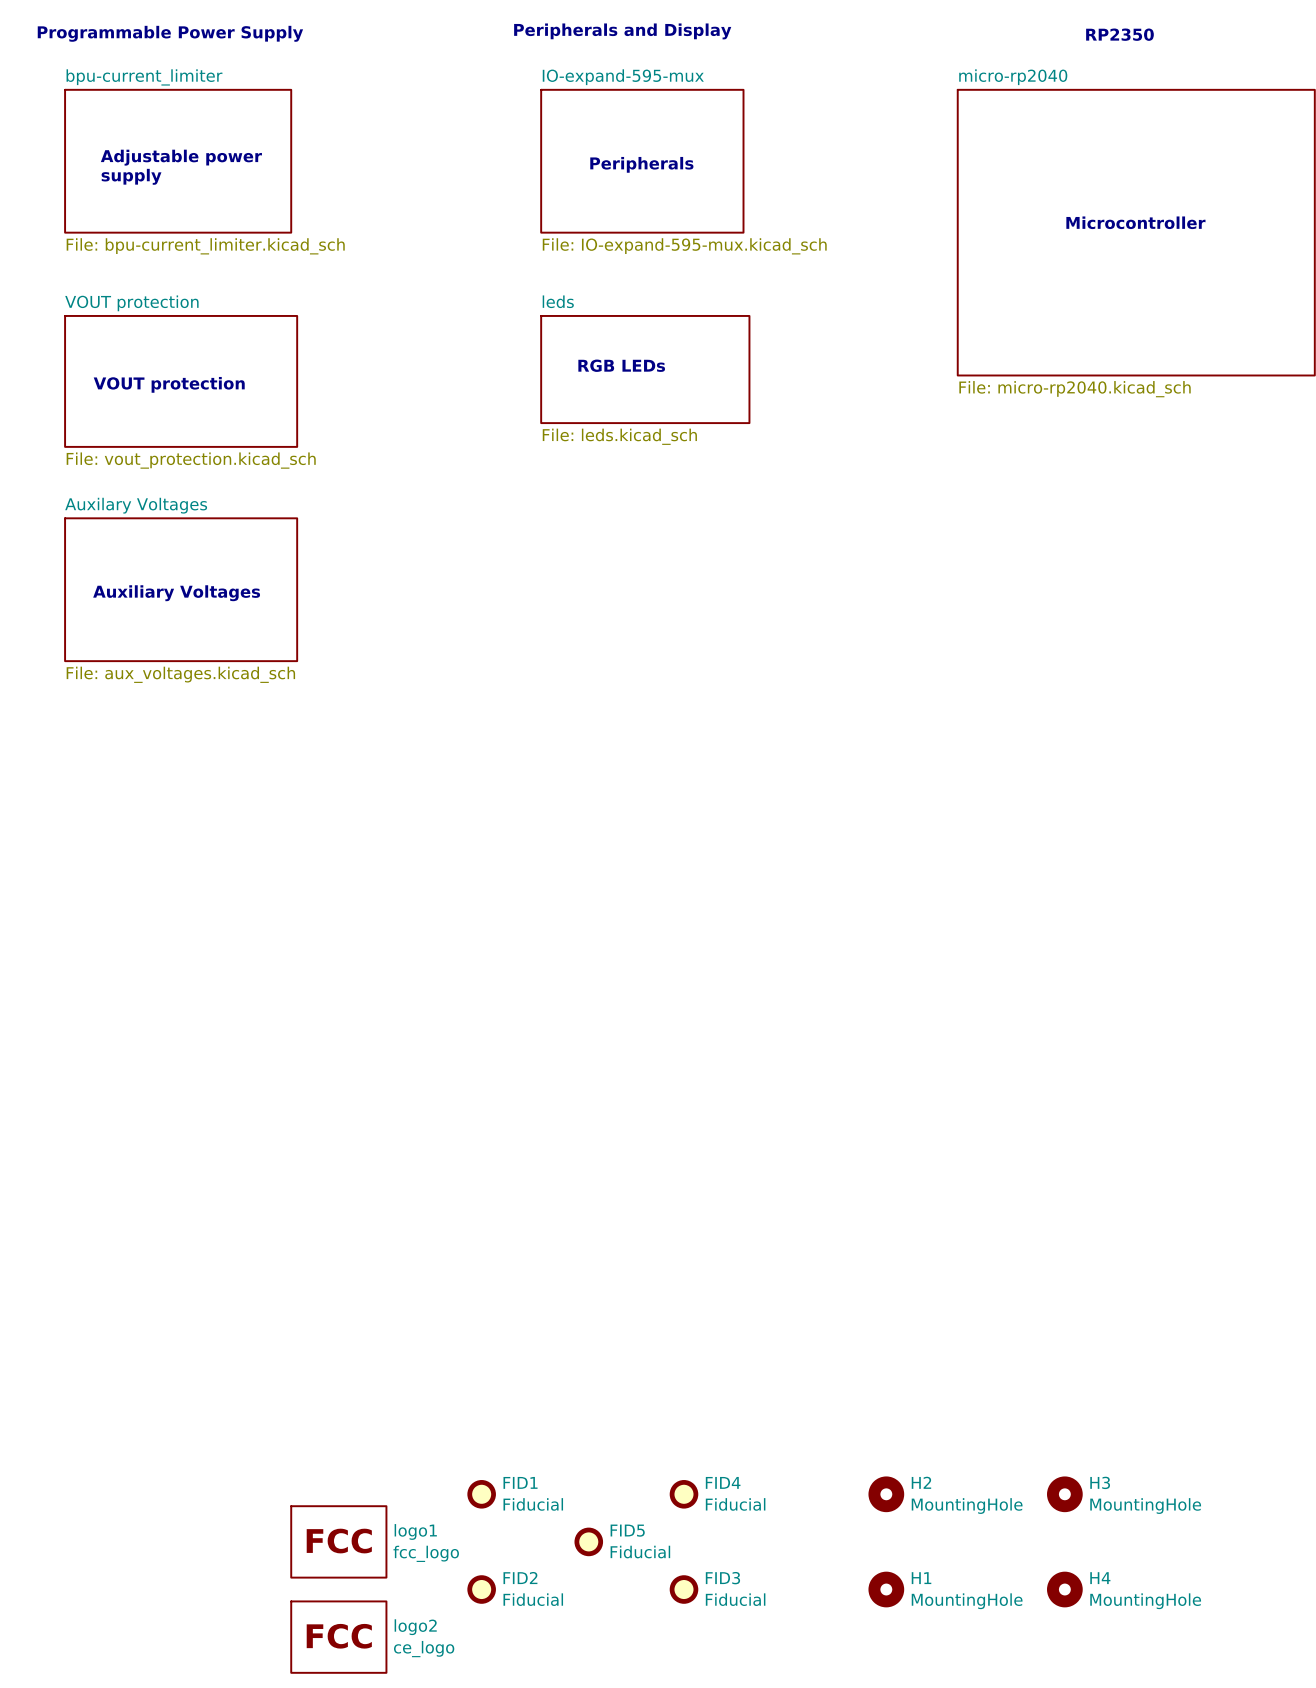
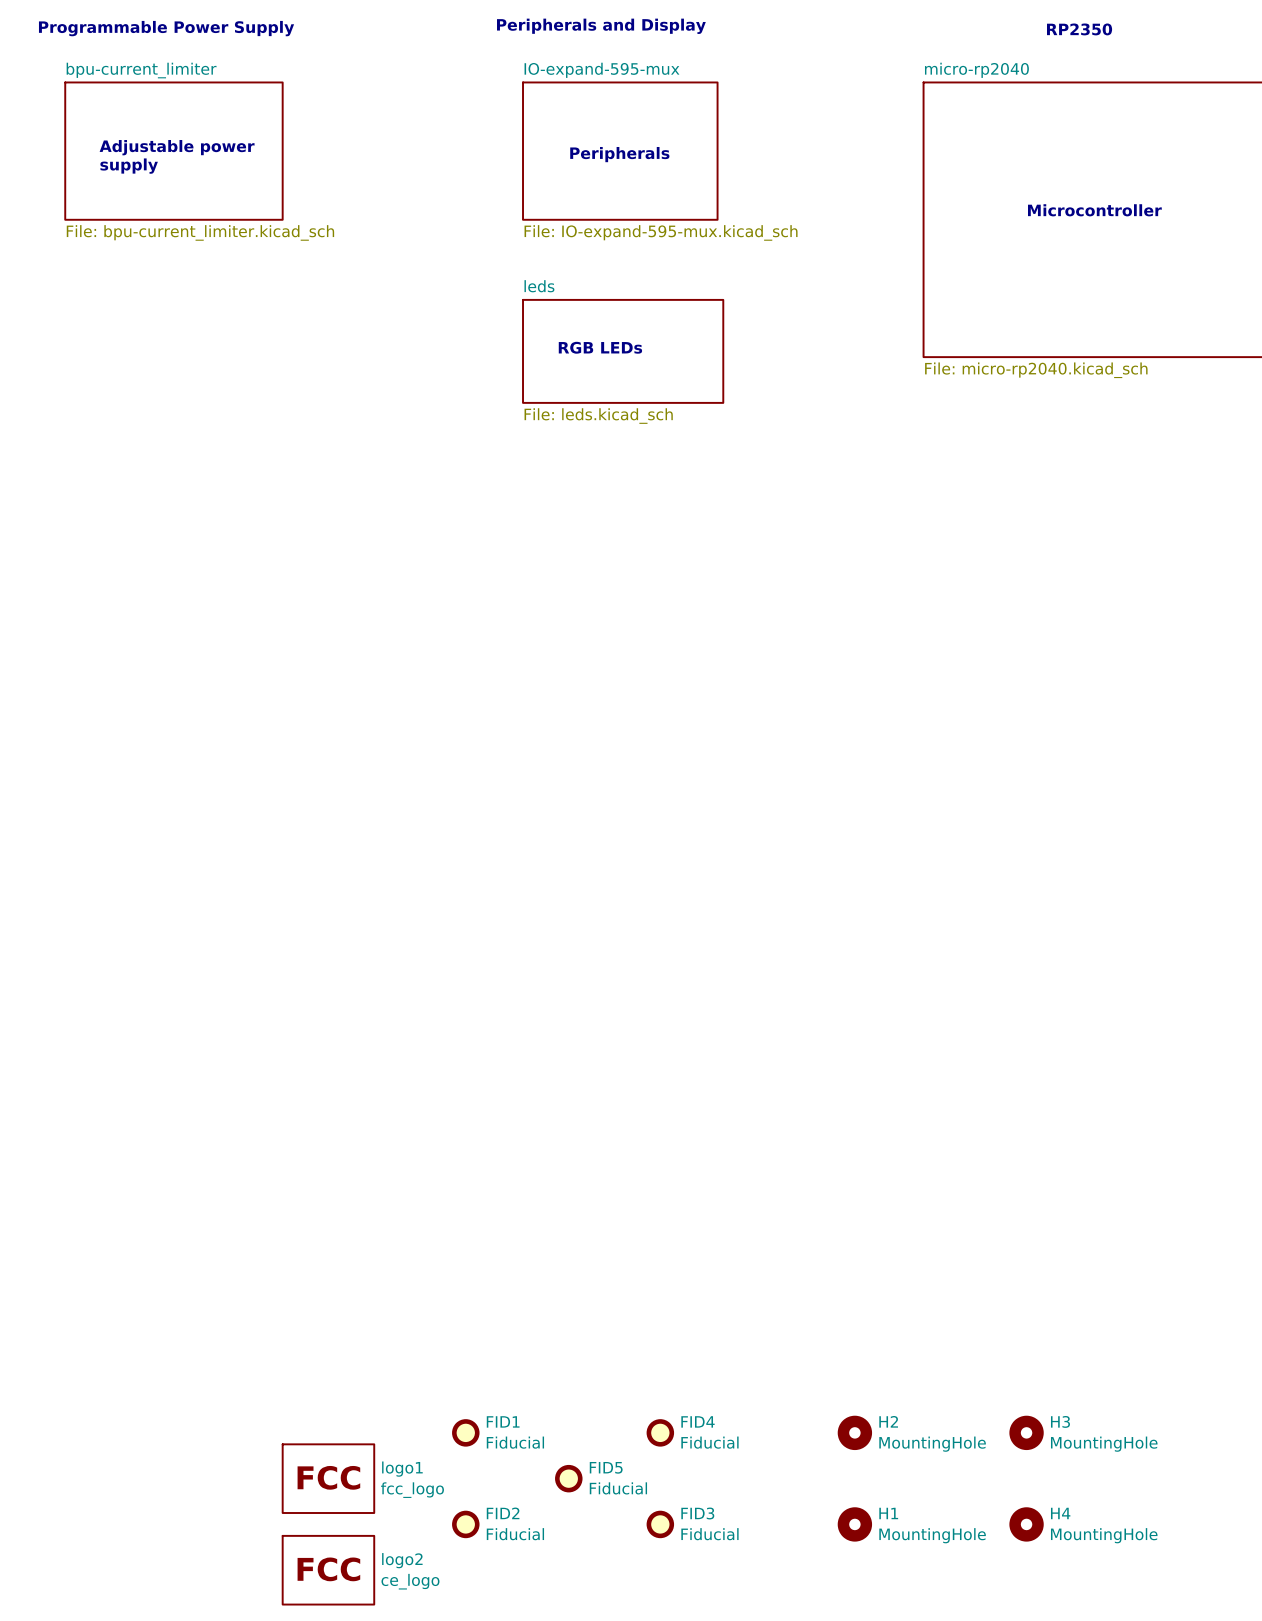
sheet VOUT protection: File: vout_protection.kicad_sch (181, 381) -> none
text: VOUT protection (169, 384) -> none
sheet Auxilary Voltages: File: aux_voltages.kicad_sch (181, 589) -> none
text: Auxiliary Voltages (176, 593) -> none

